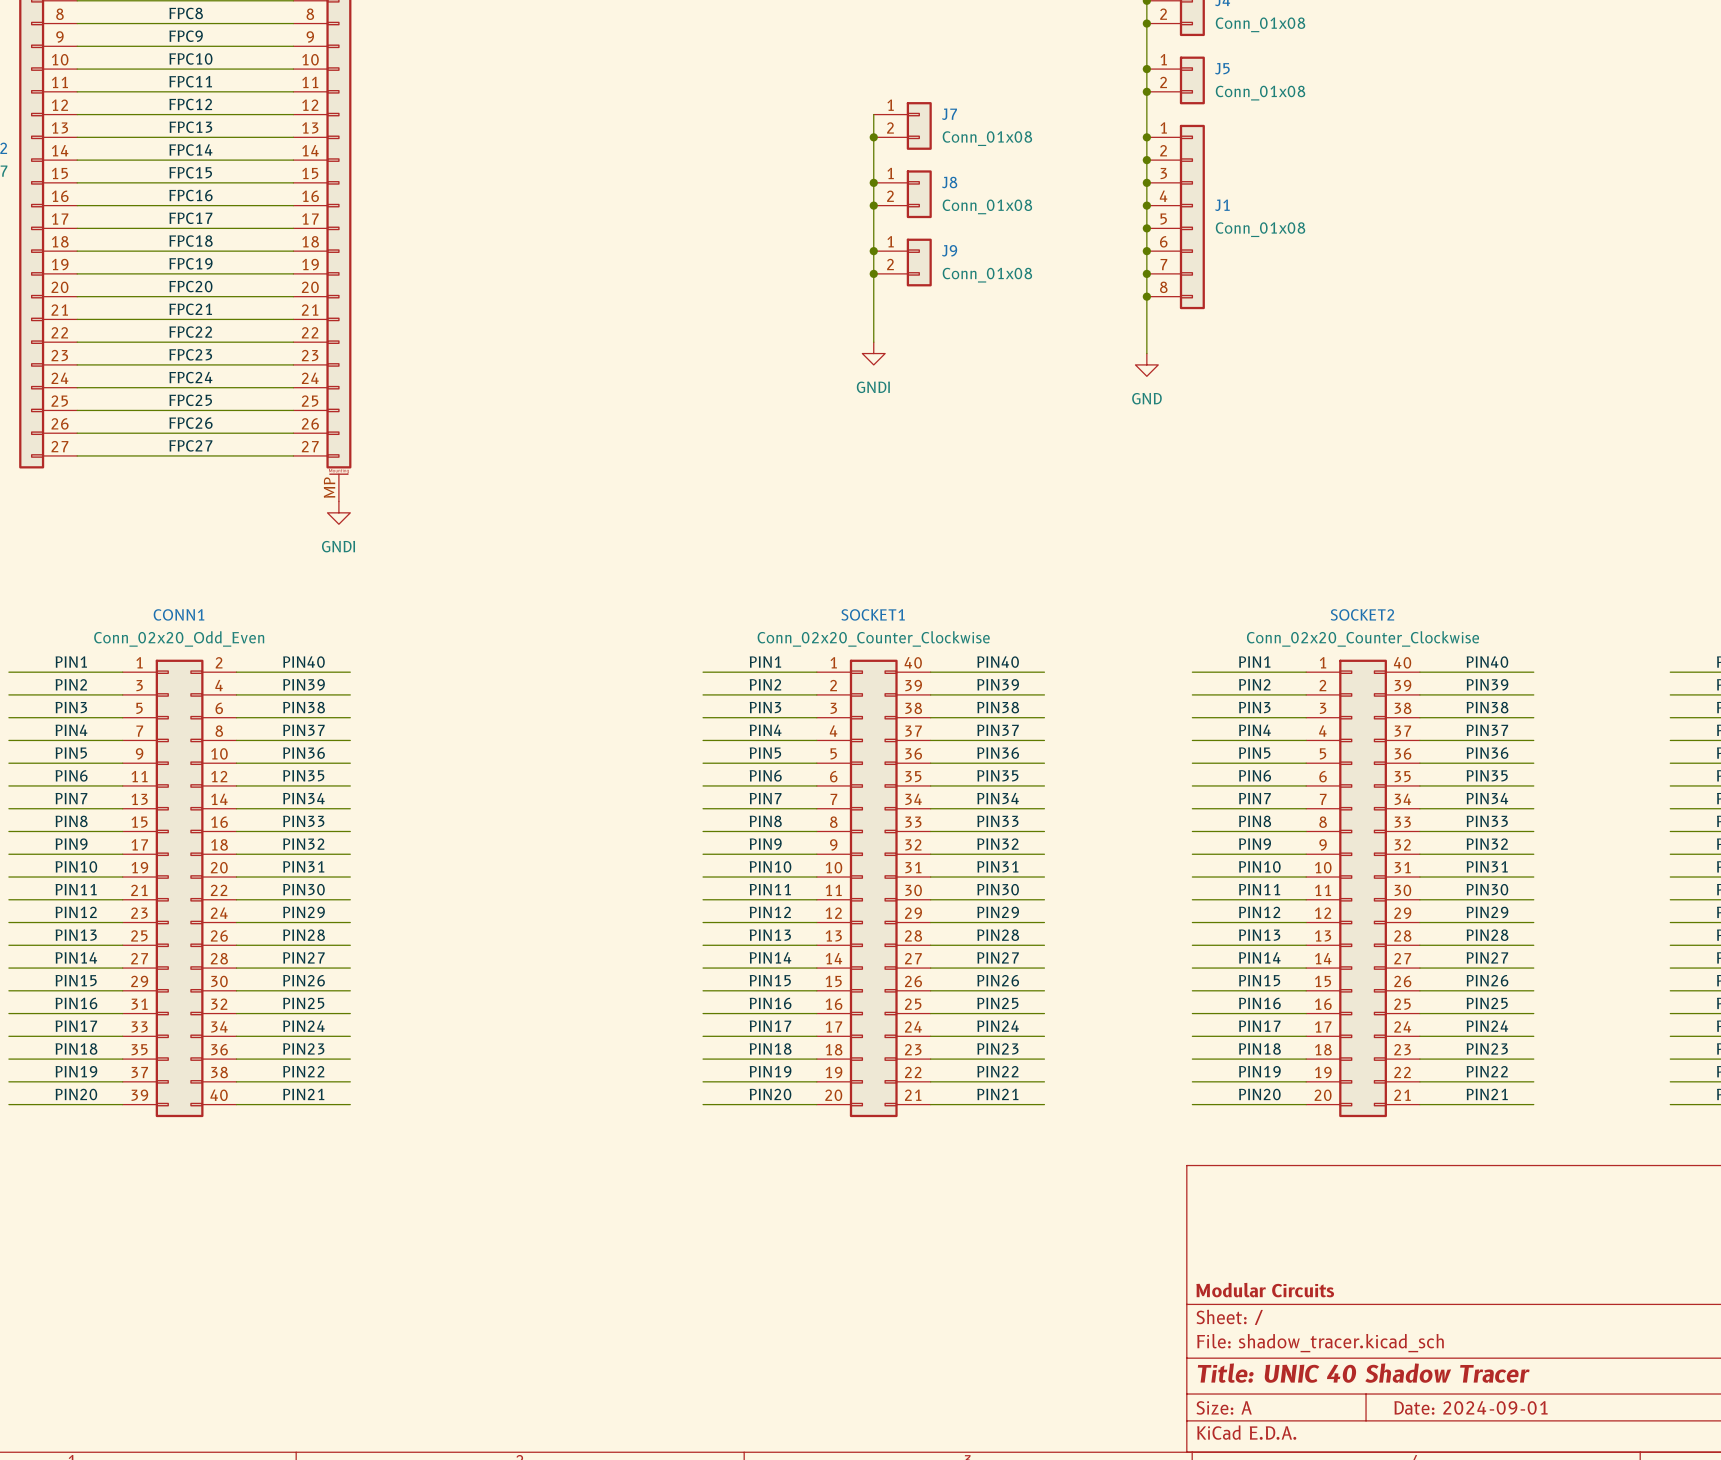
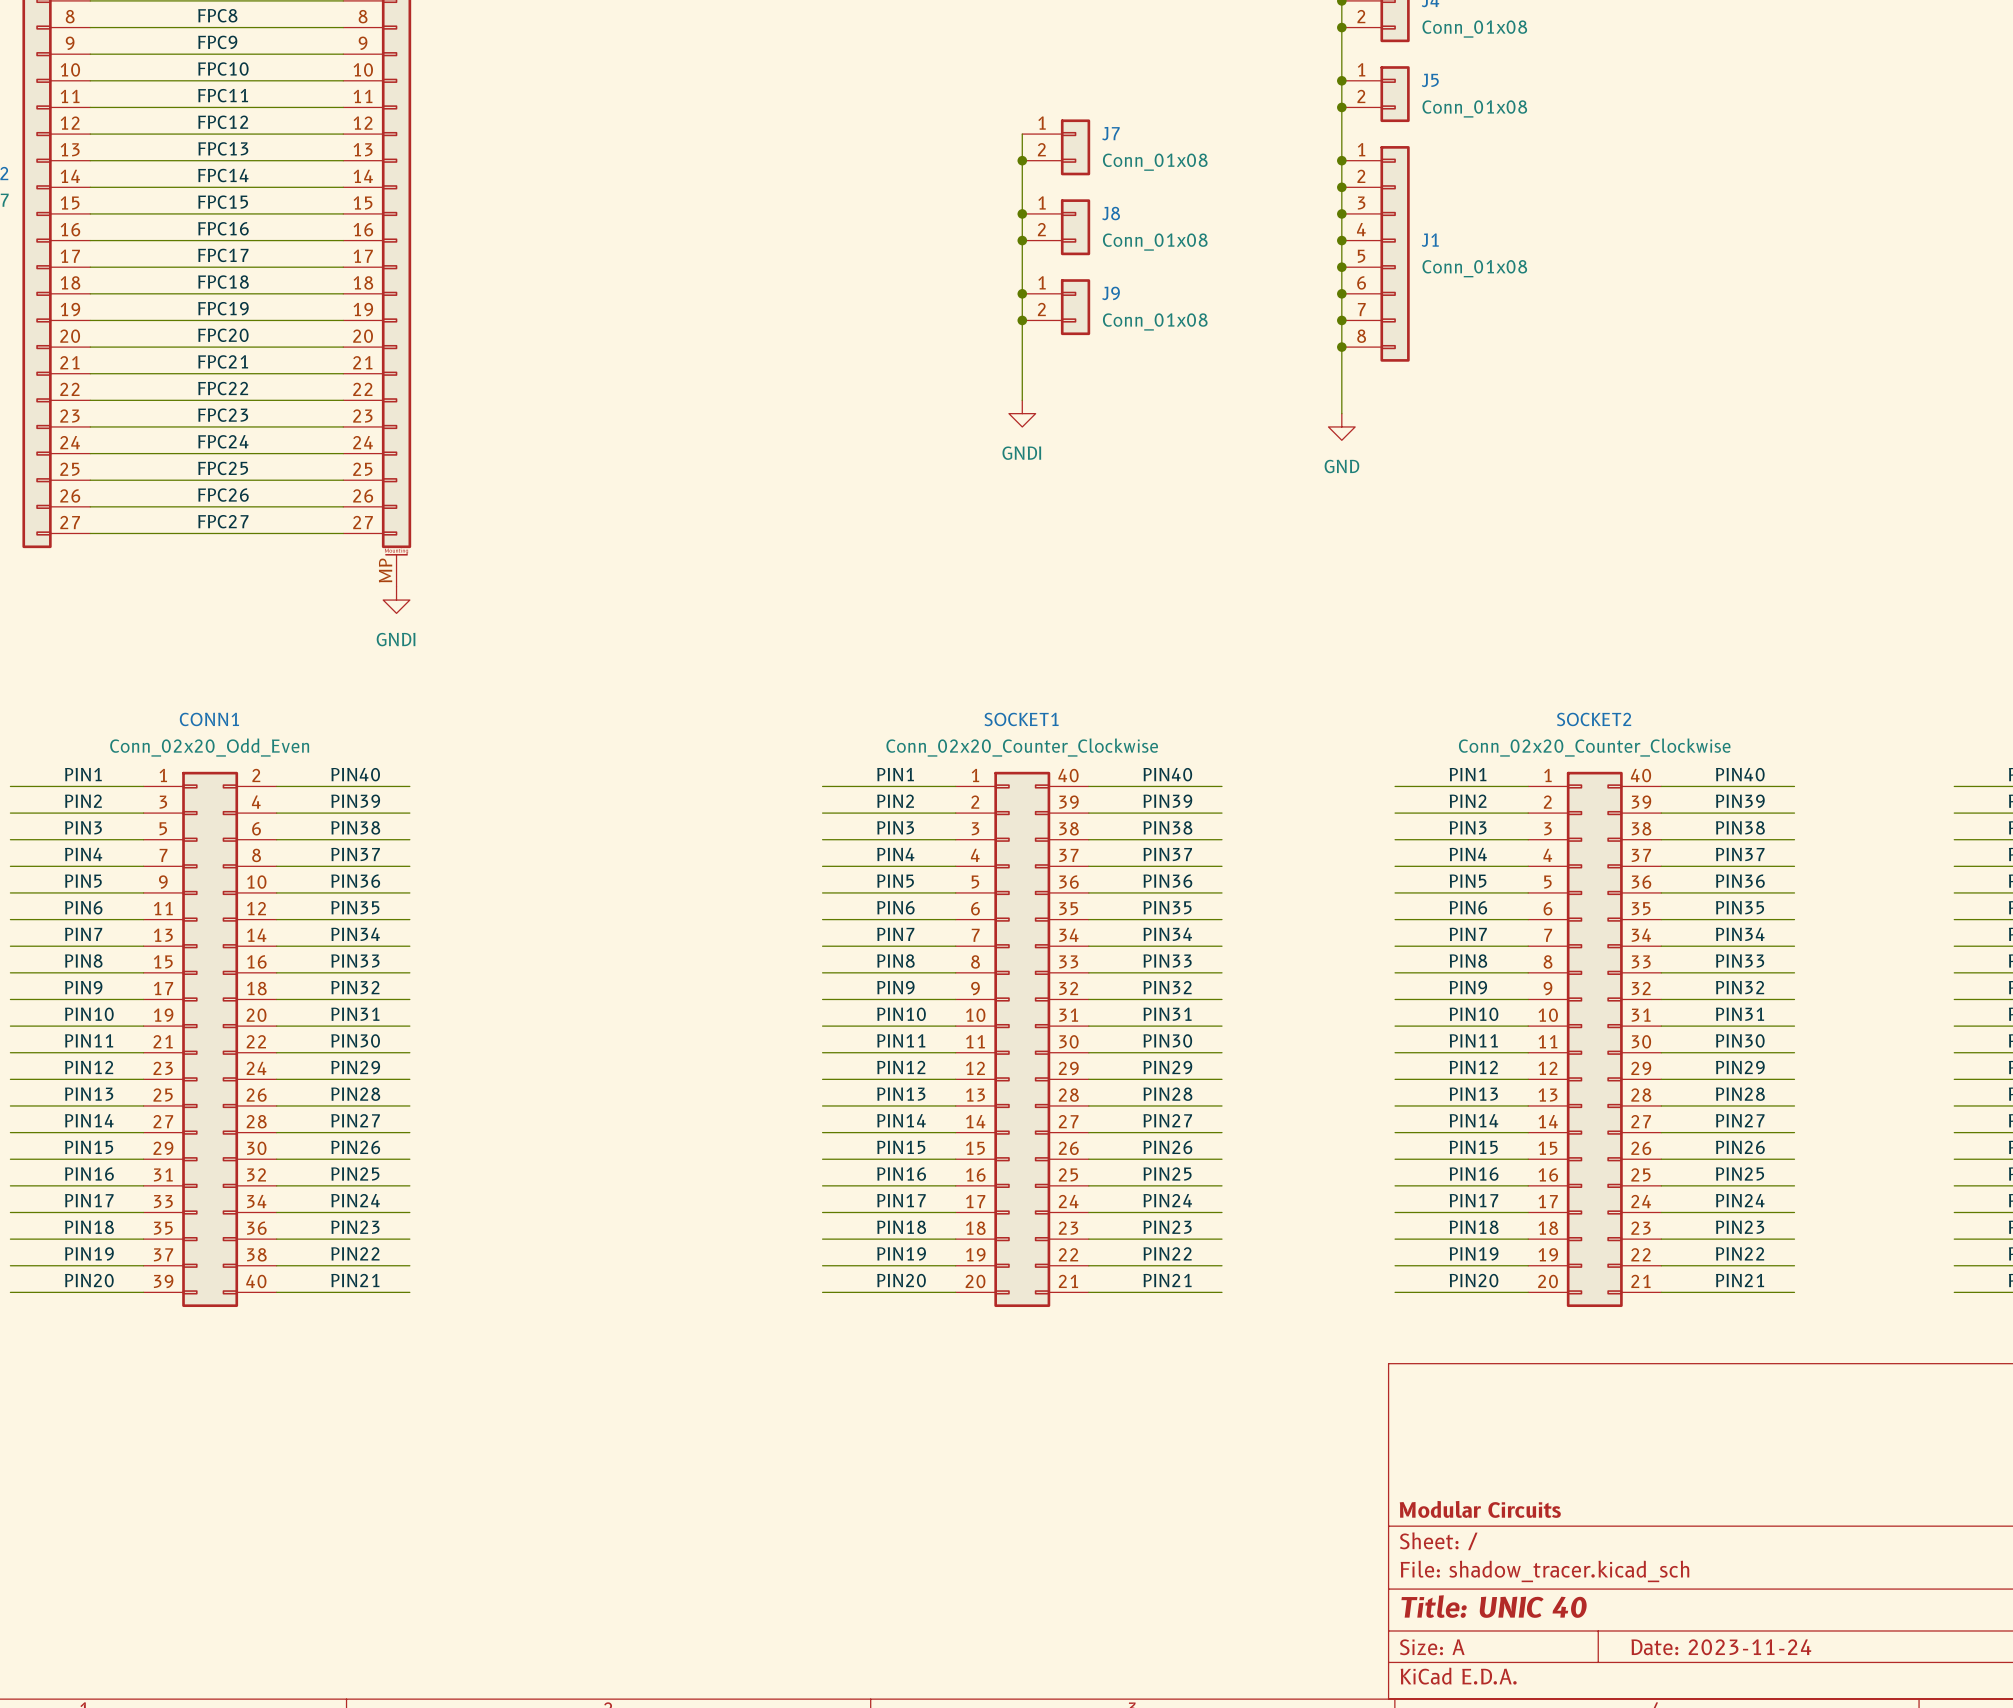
title block: Title: UNIC 40 Shadow Tracer (1363, 1373) -> Title: UNIC 40 (1494, 1606)
title block: Date: 2024-09-01 (1471, 1407) -> Date: 2023-11-24 (1721, 1647)

